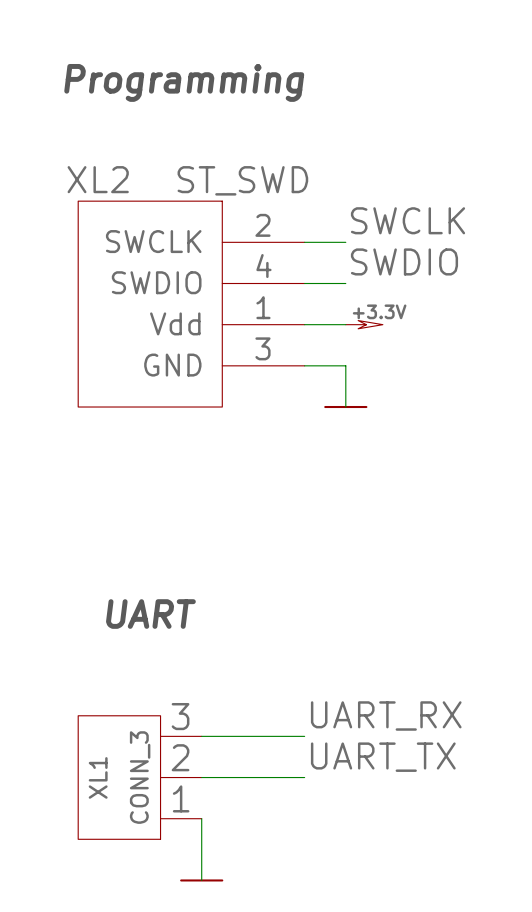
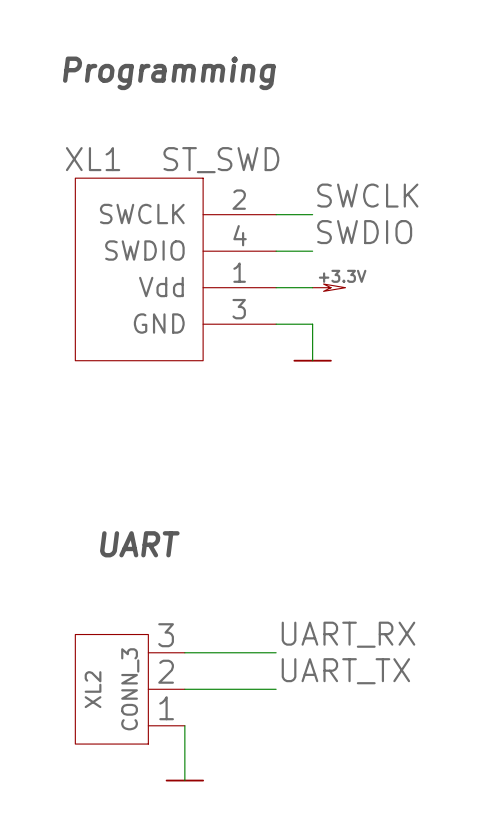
XL2 name: XL2 (98, 179) -> XL1 (93, 159)
XL1 name: XL1 (98, 777) -> XL2 (93, 689)

